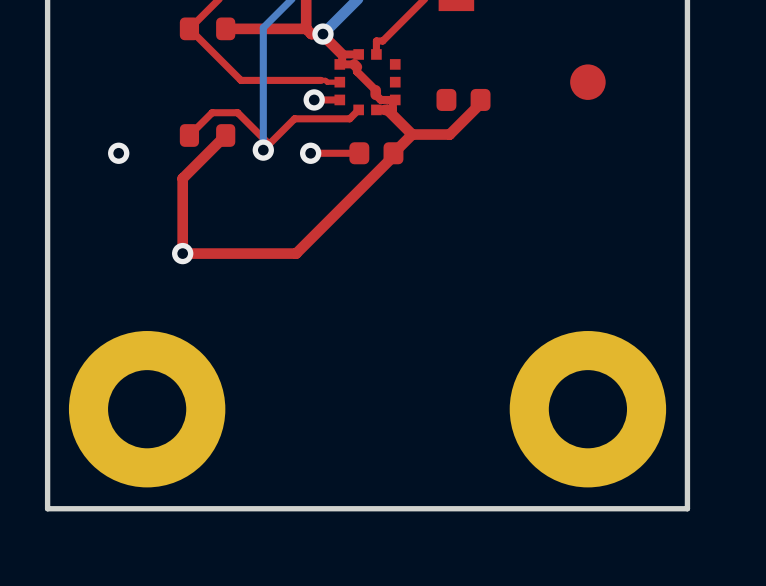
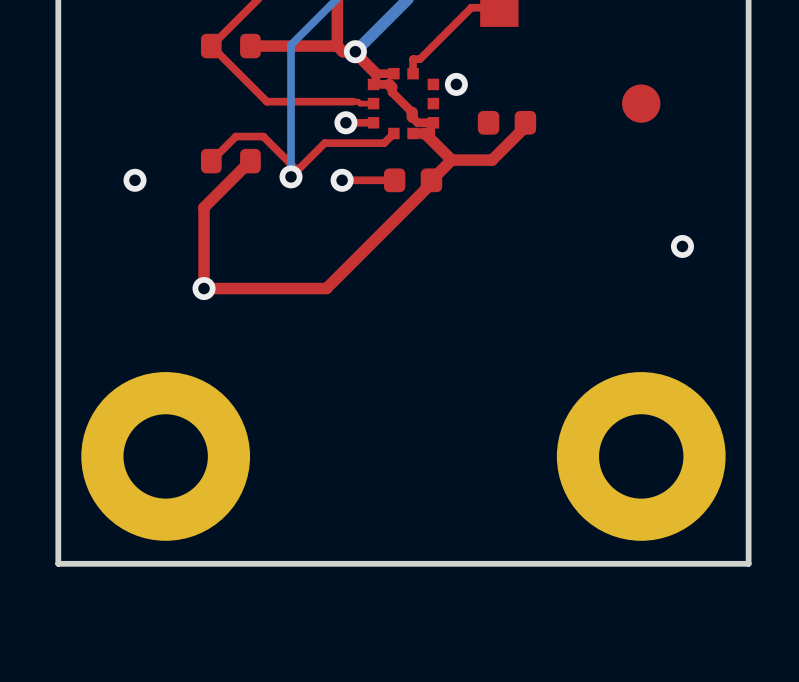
via: none -> (456, 84)
via: none -> (682, 246)

